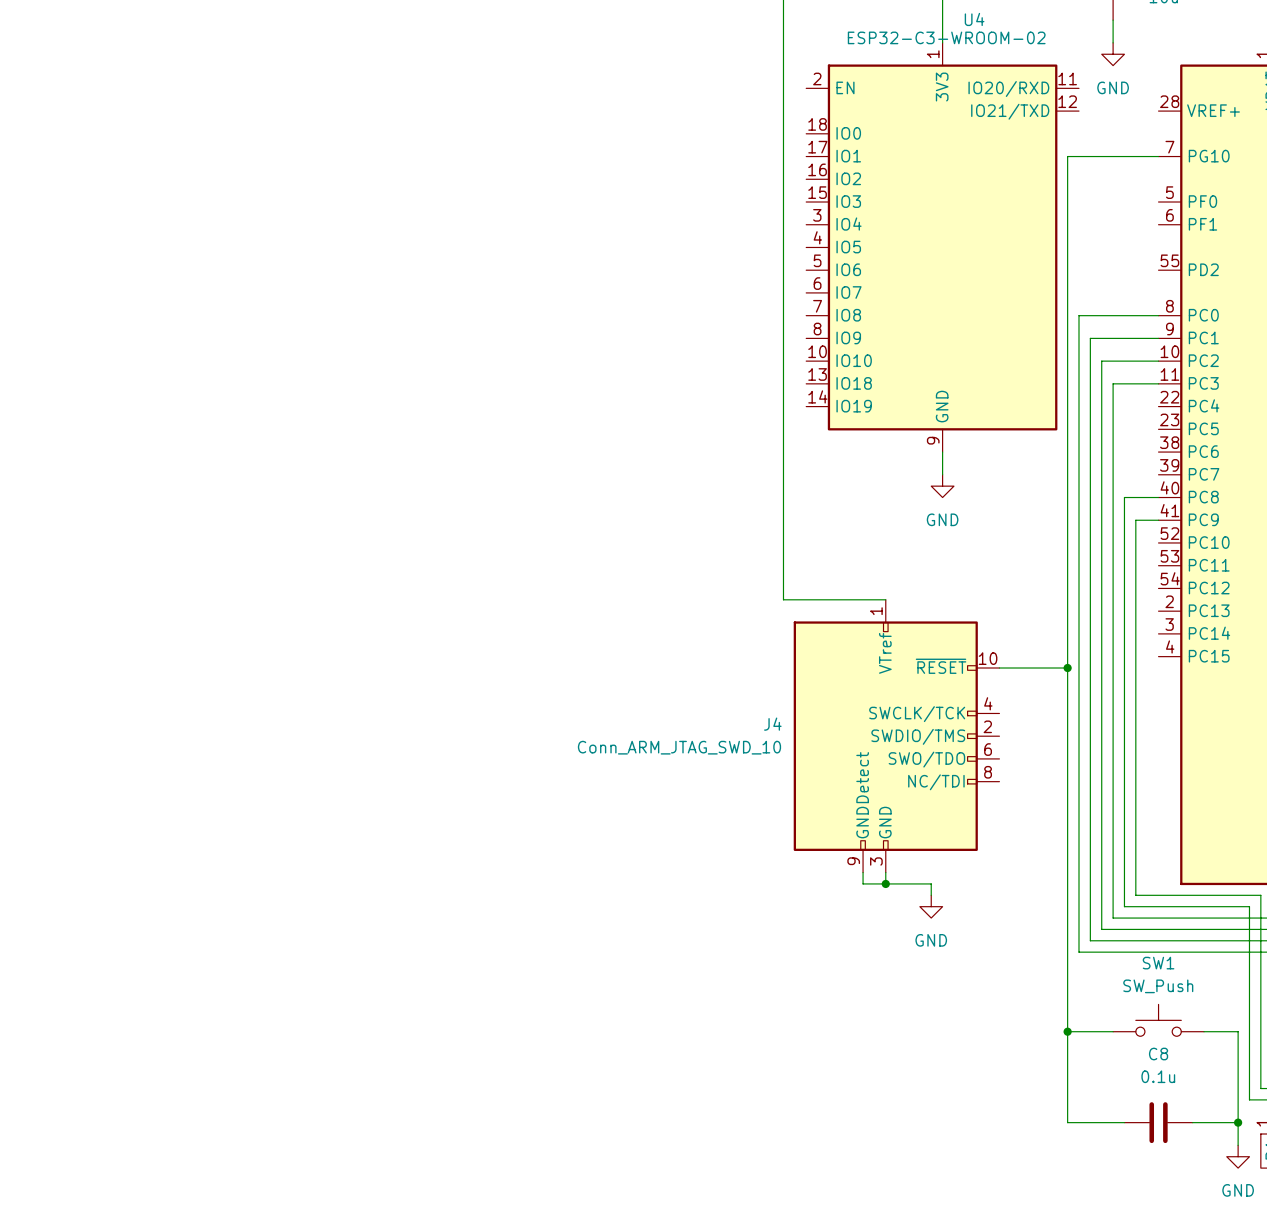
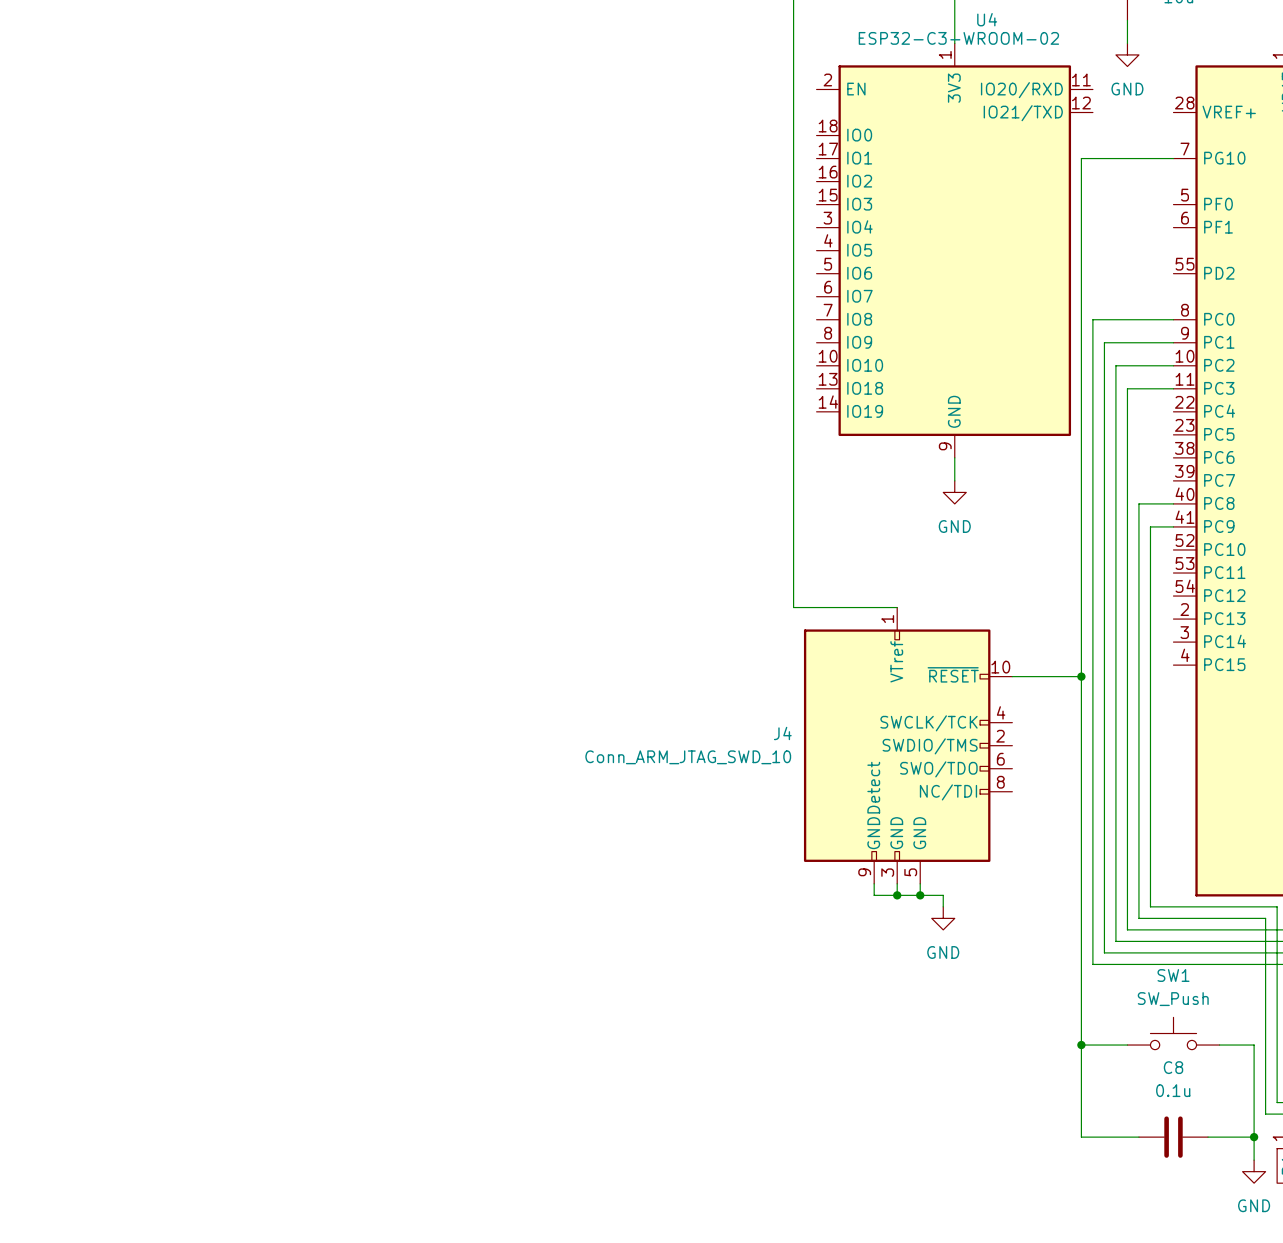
J4 symbol: [793, 599, 1000, 873] -> [803, 607, 1013, 884]
wire: none -> (920, 883) (920, 895)
junction: none -> (920, 895)

